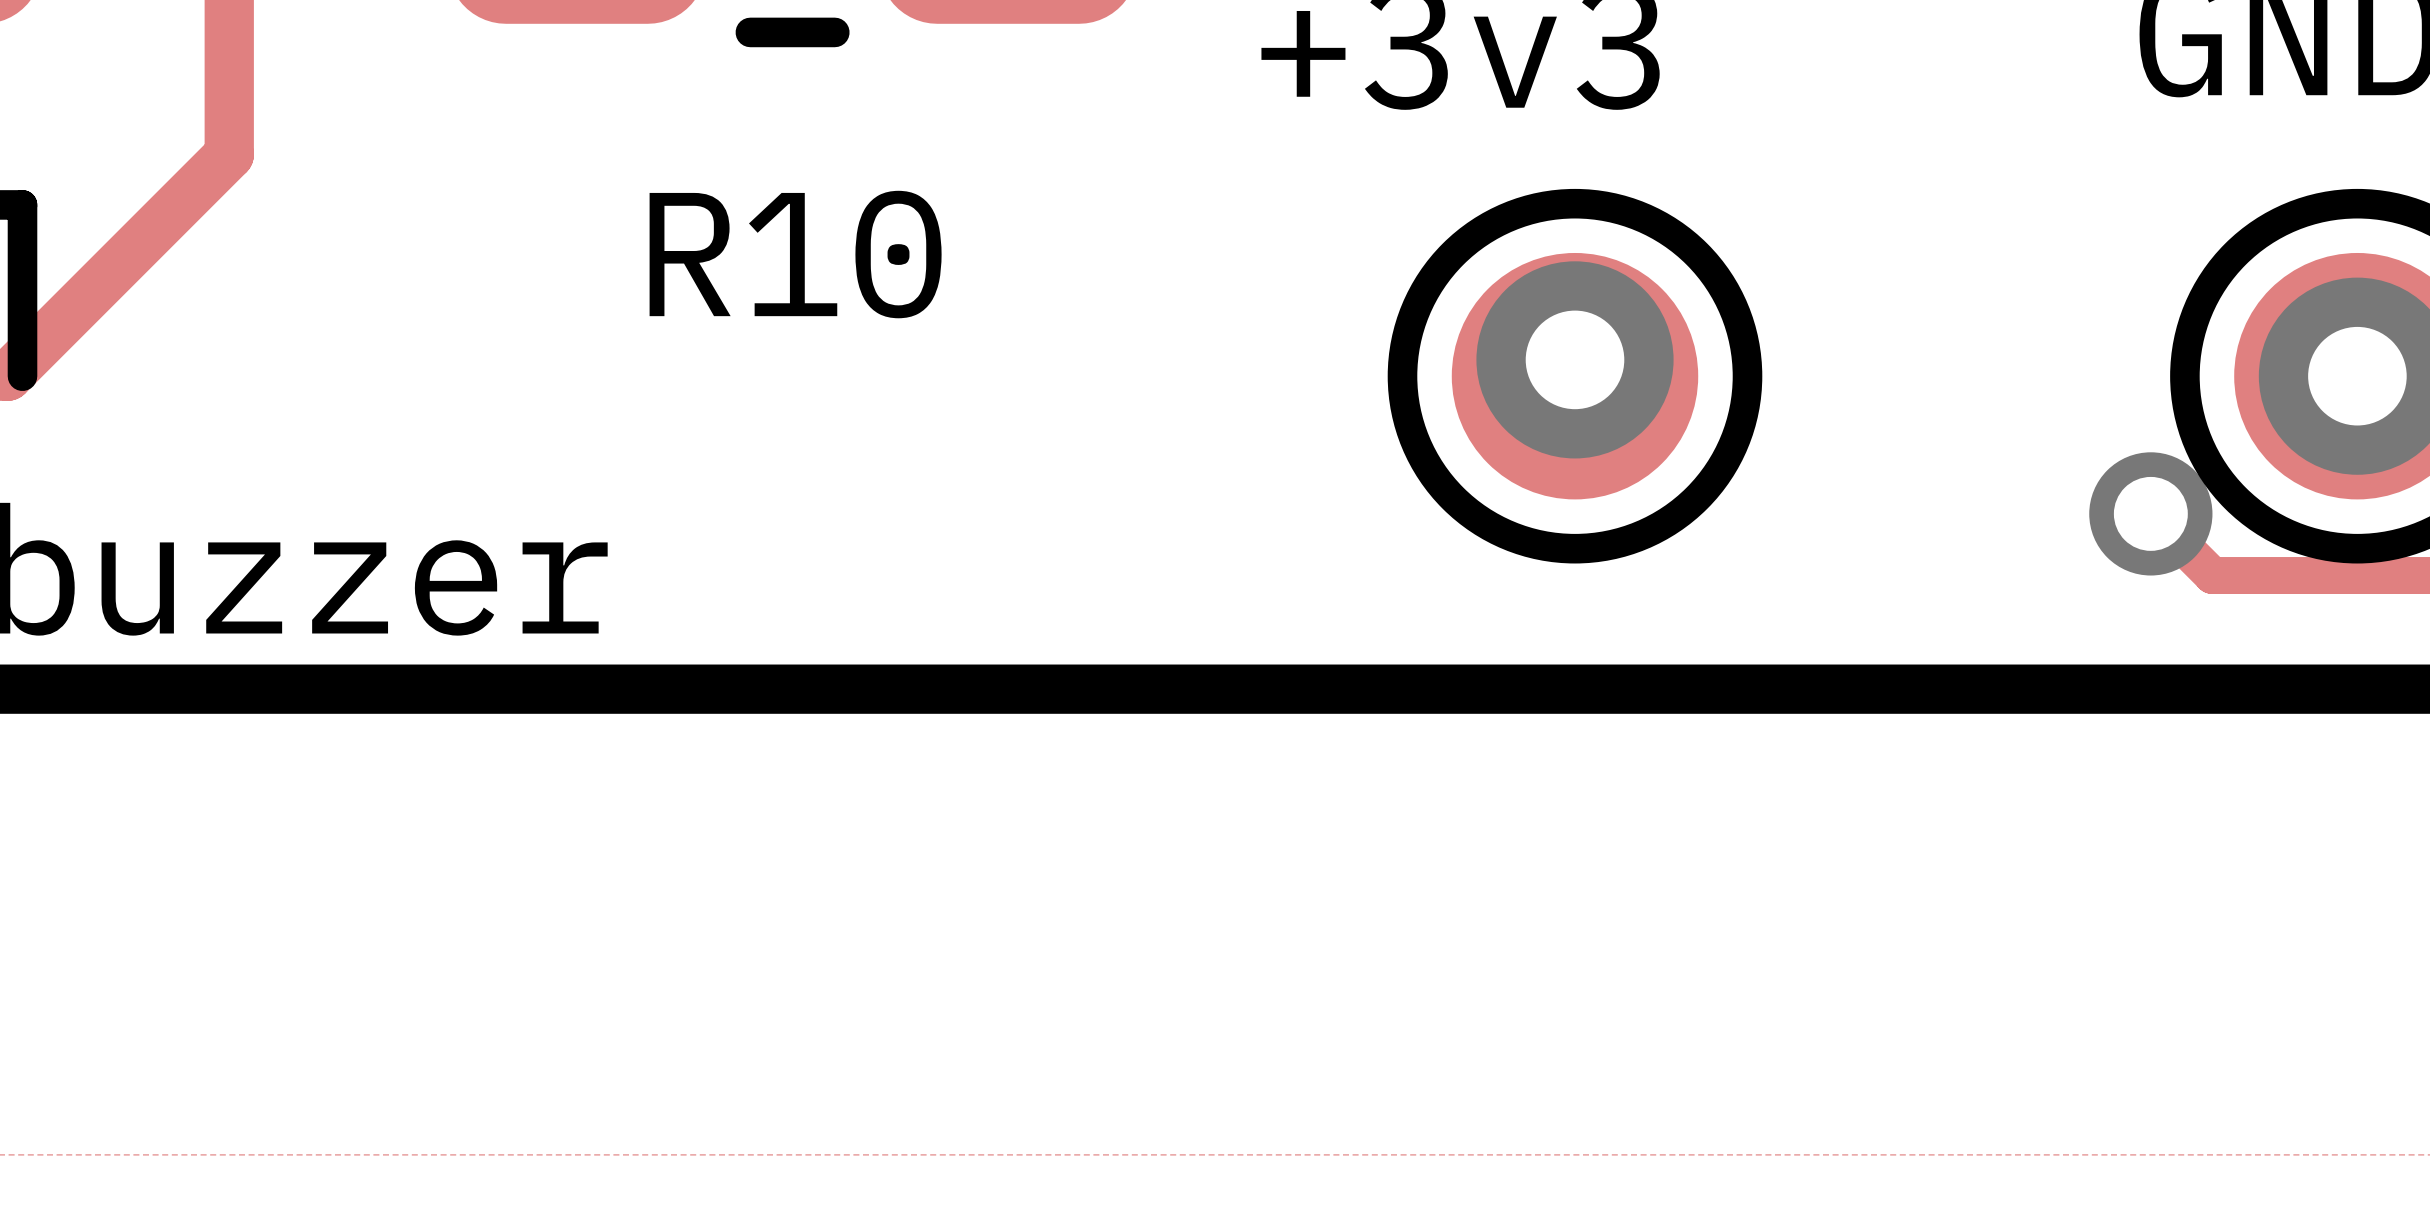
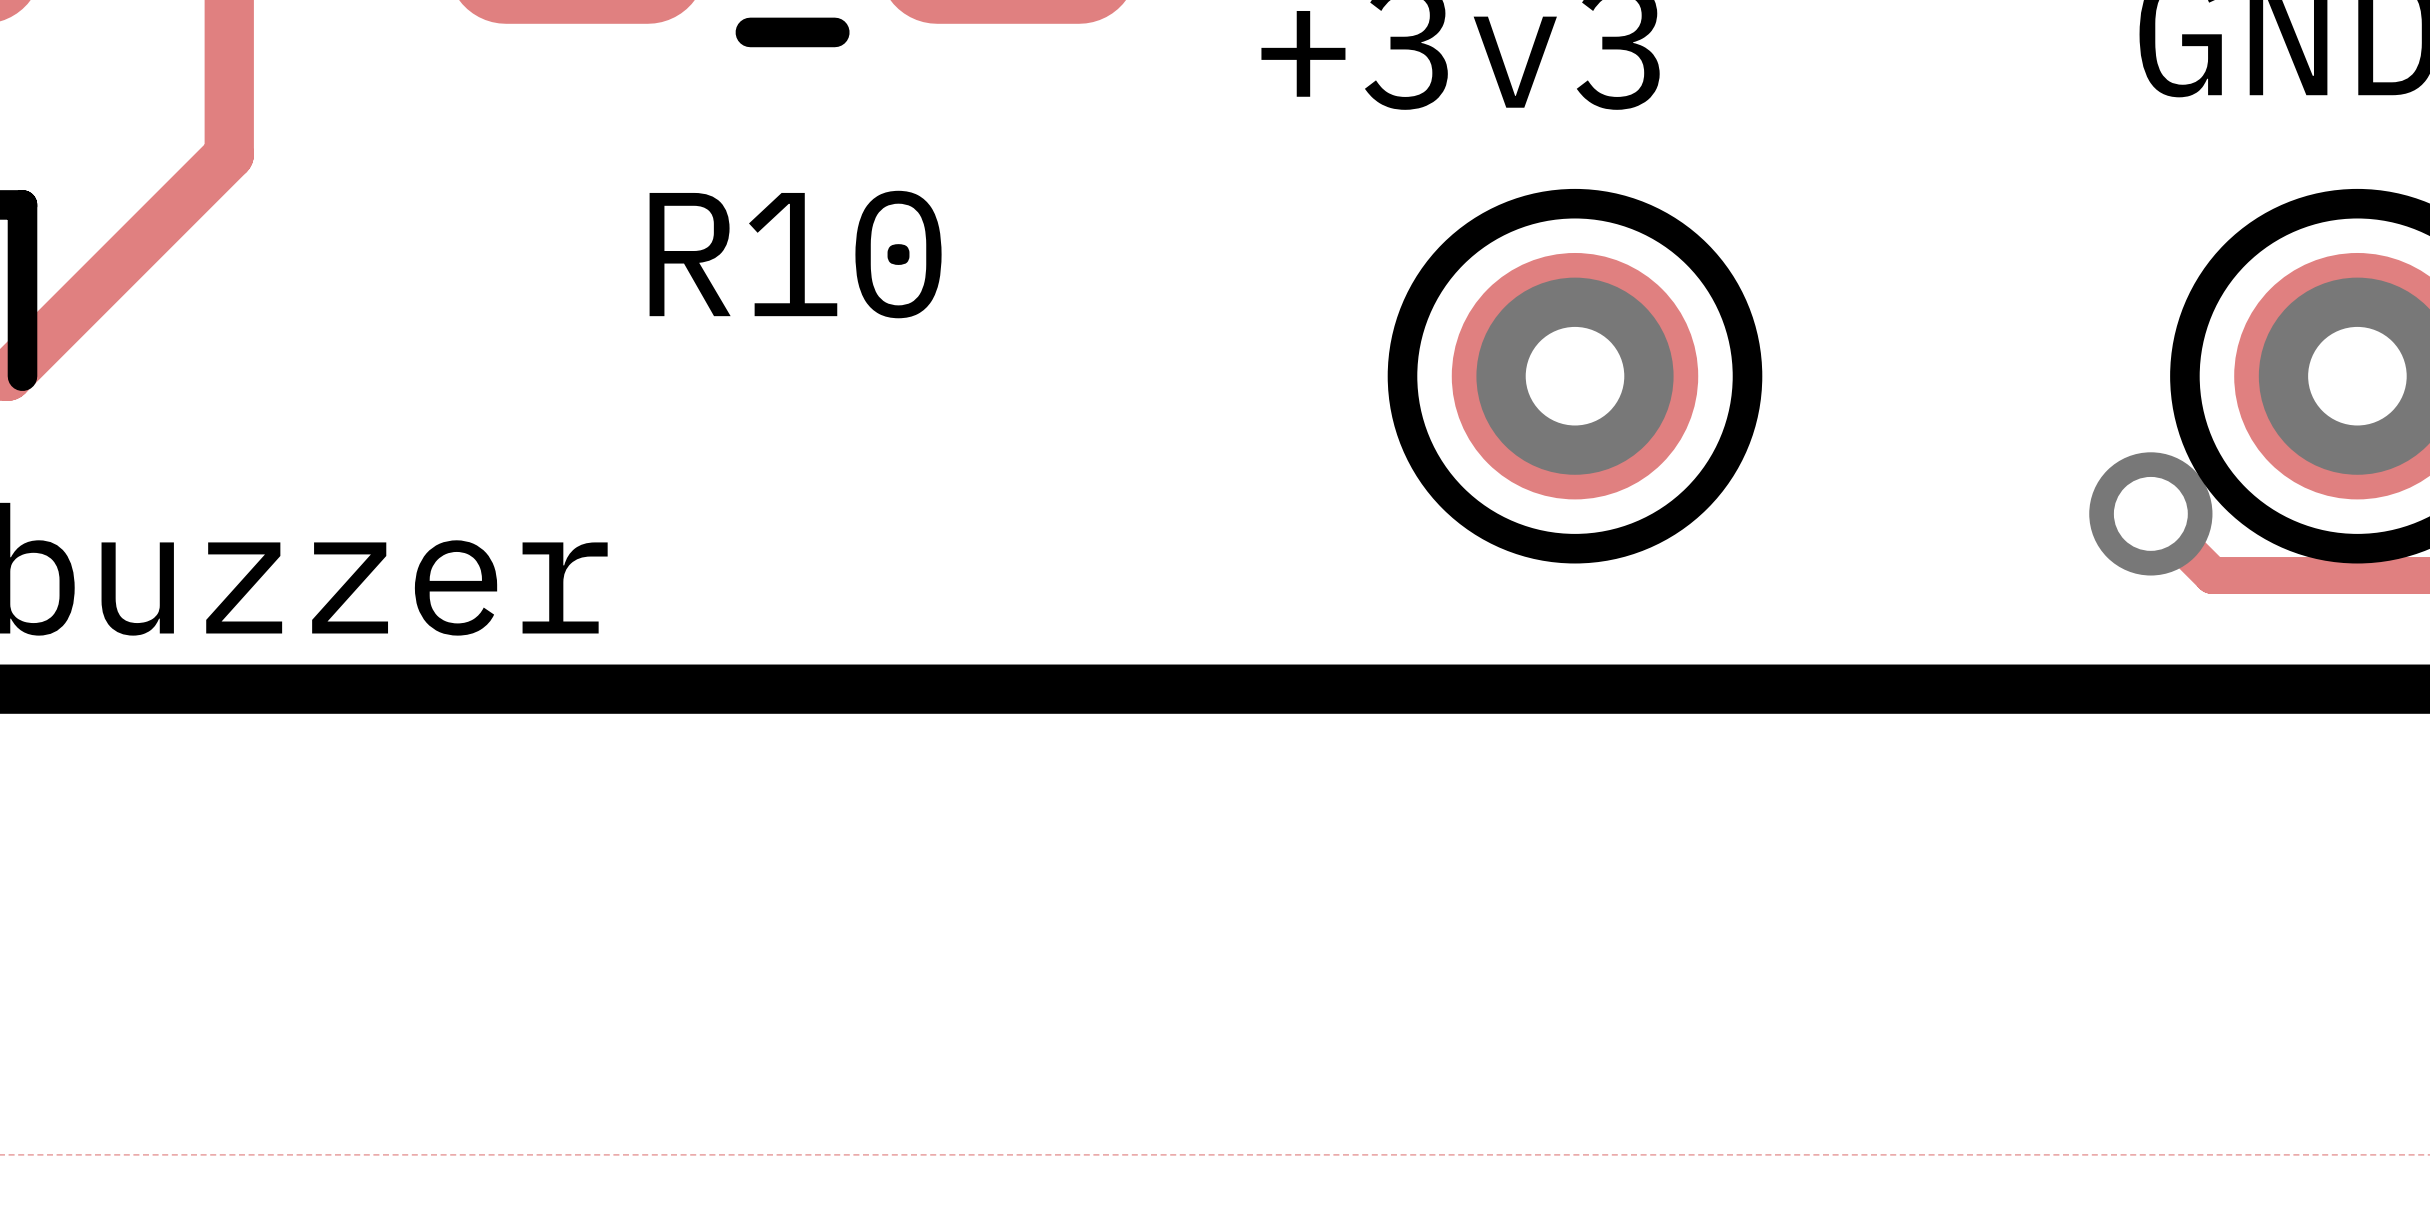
via position: (1575, 359) -> (1575, 376)

